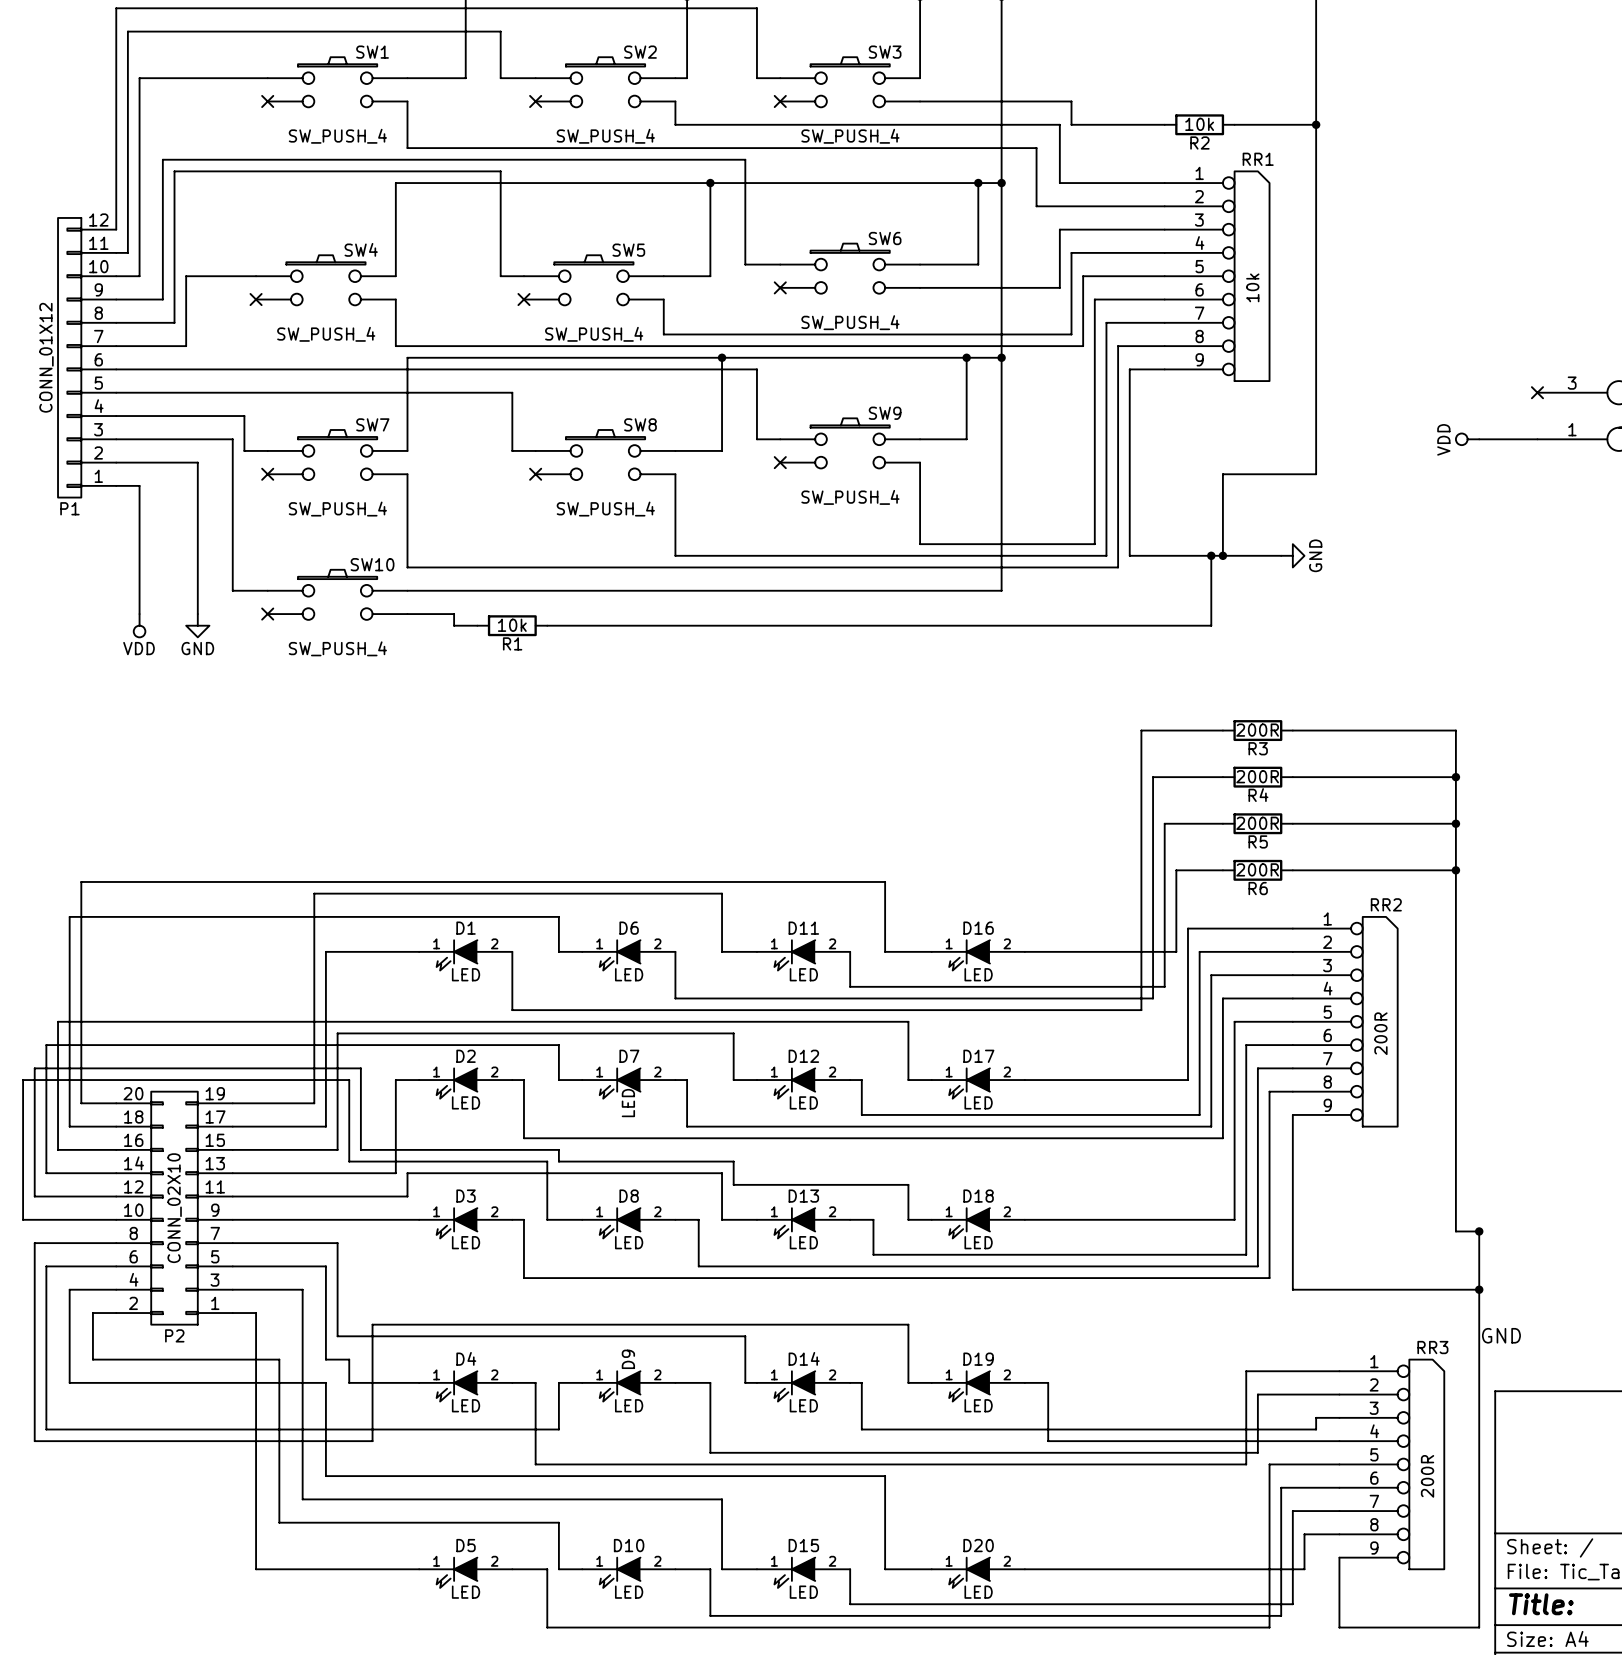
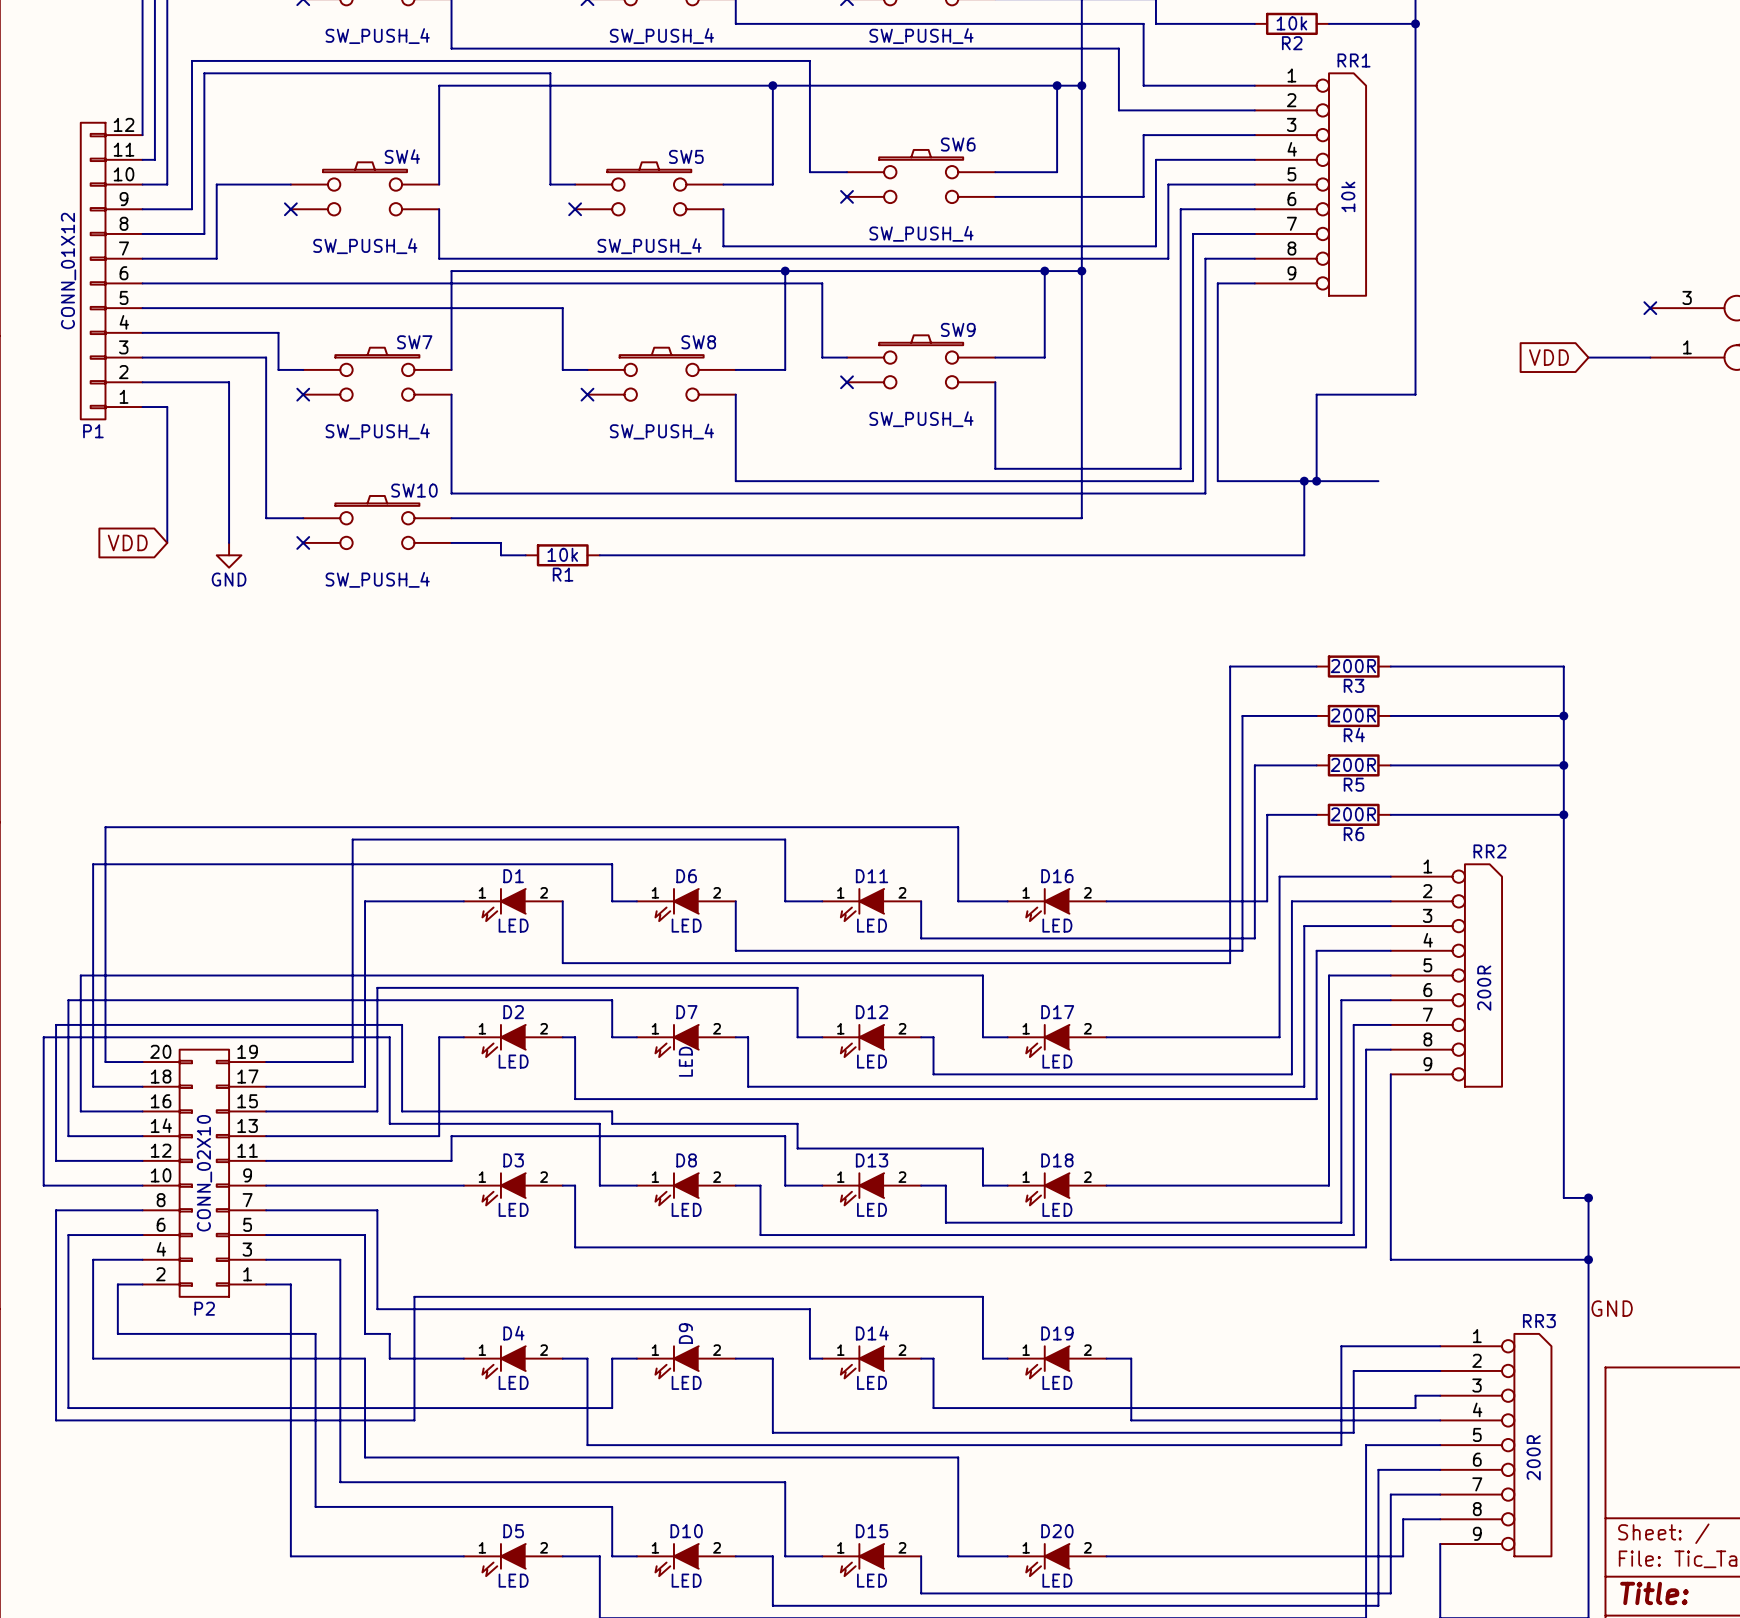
global label: none -> VDD (1548, 357)
power symbol: VDD (1467, 439) -> none
power symbol: GND (1292, 555) -> none
global label: none -> VDD (127, 542)
power symbol: VDD (139, 625) -> none

